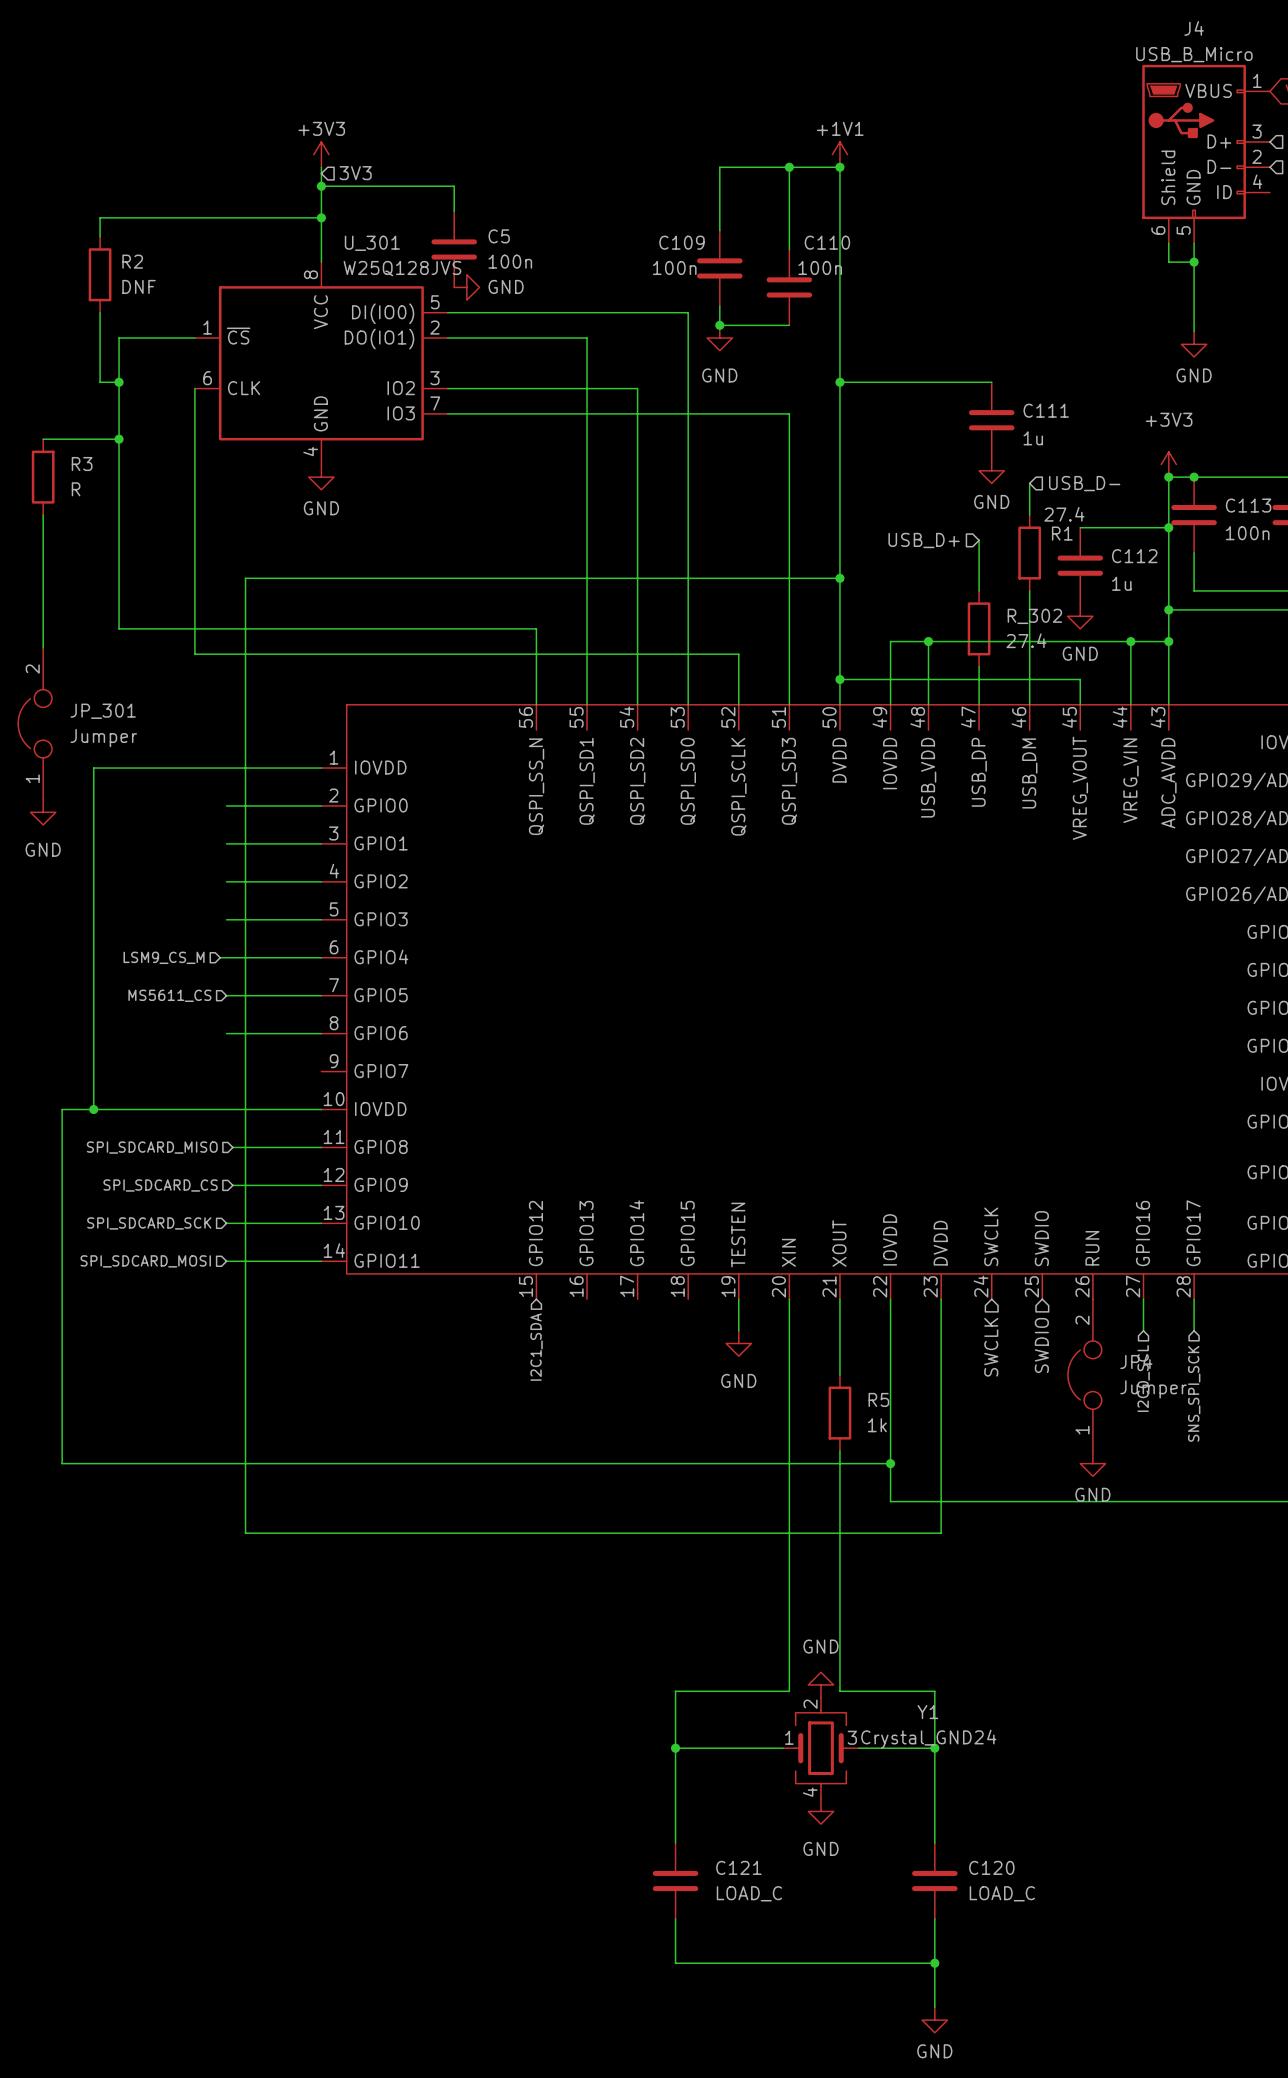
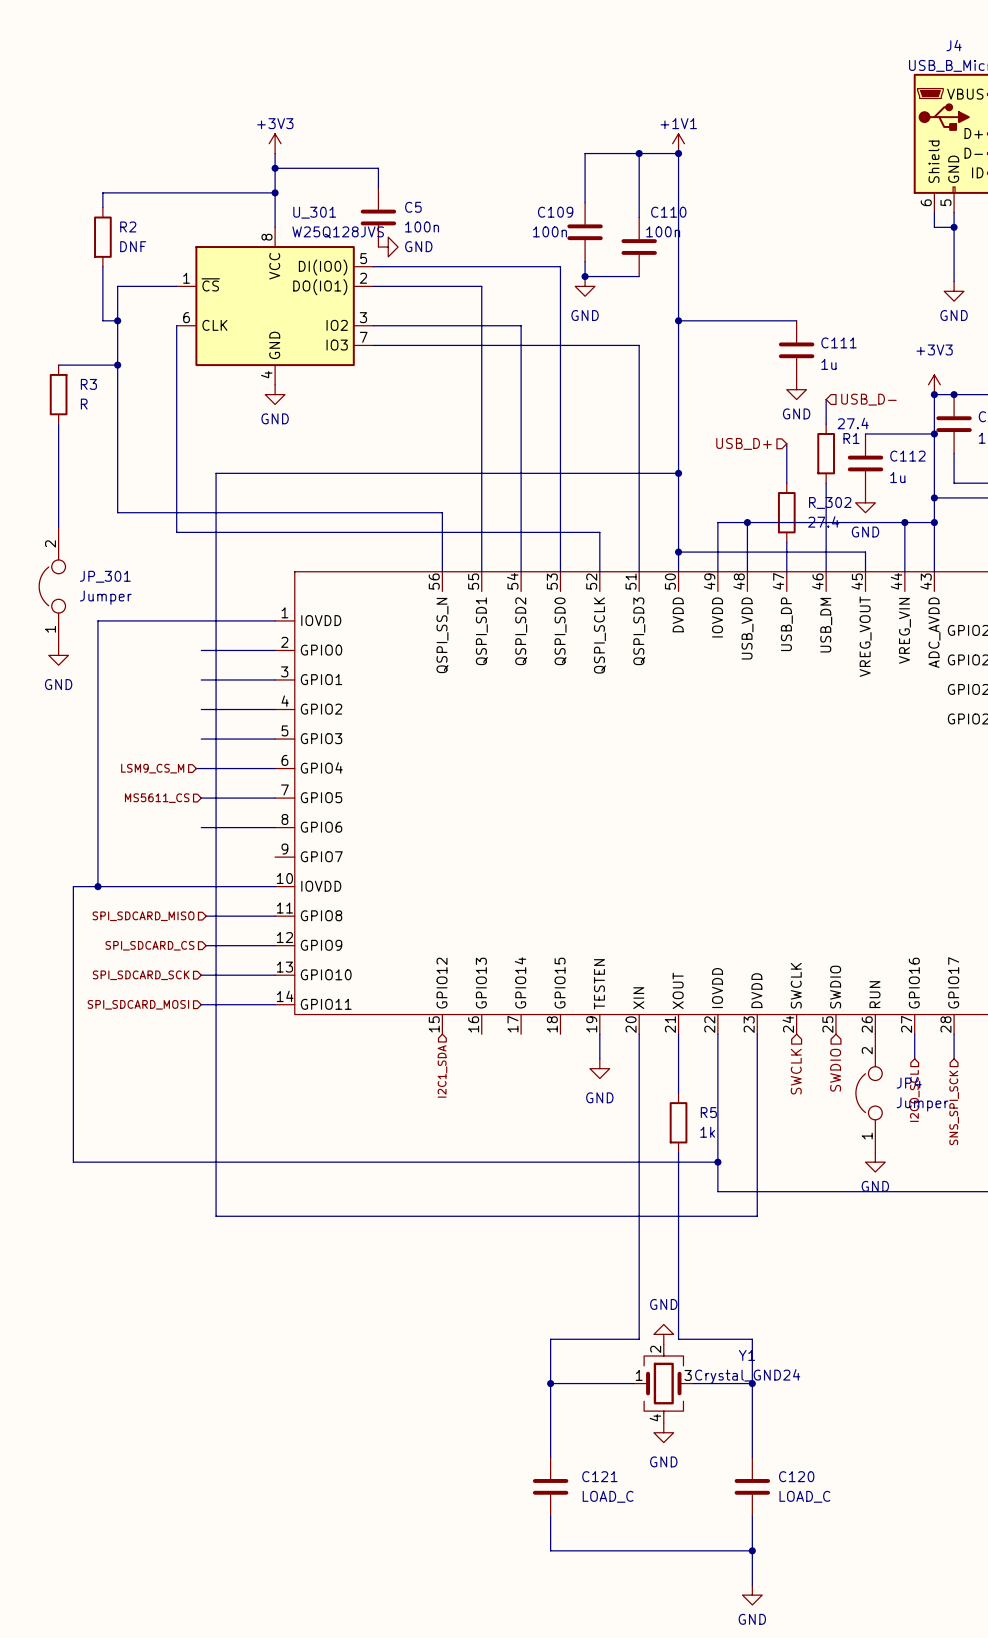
hierarchical label: 3V3 (355, 173) -> none

